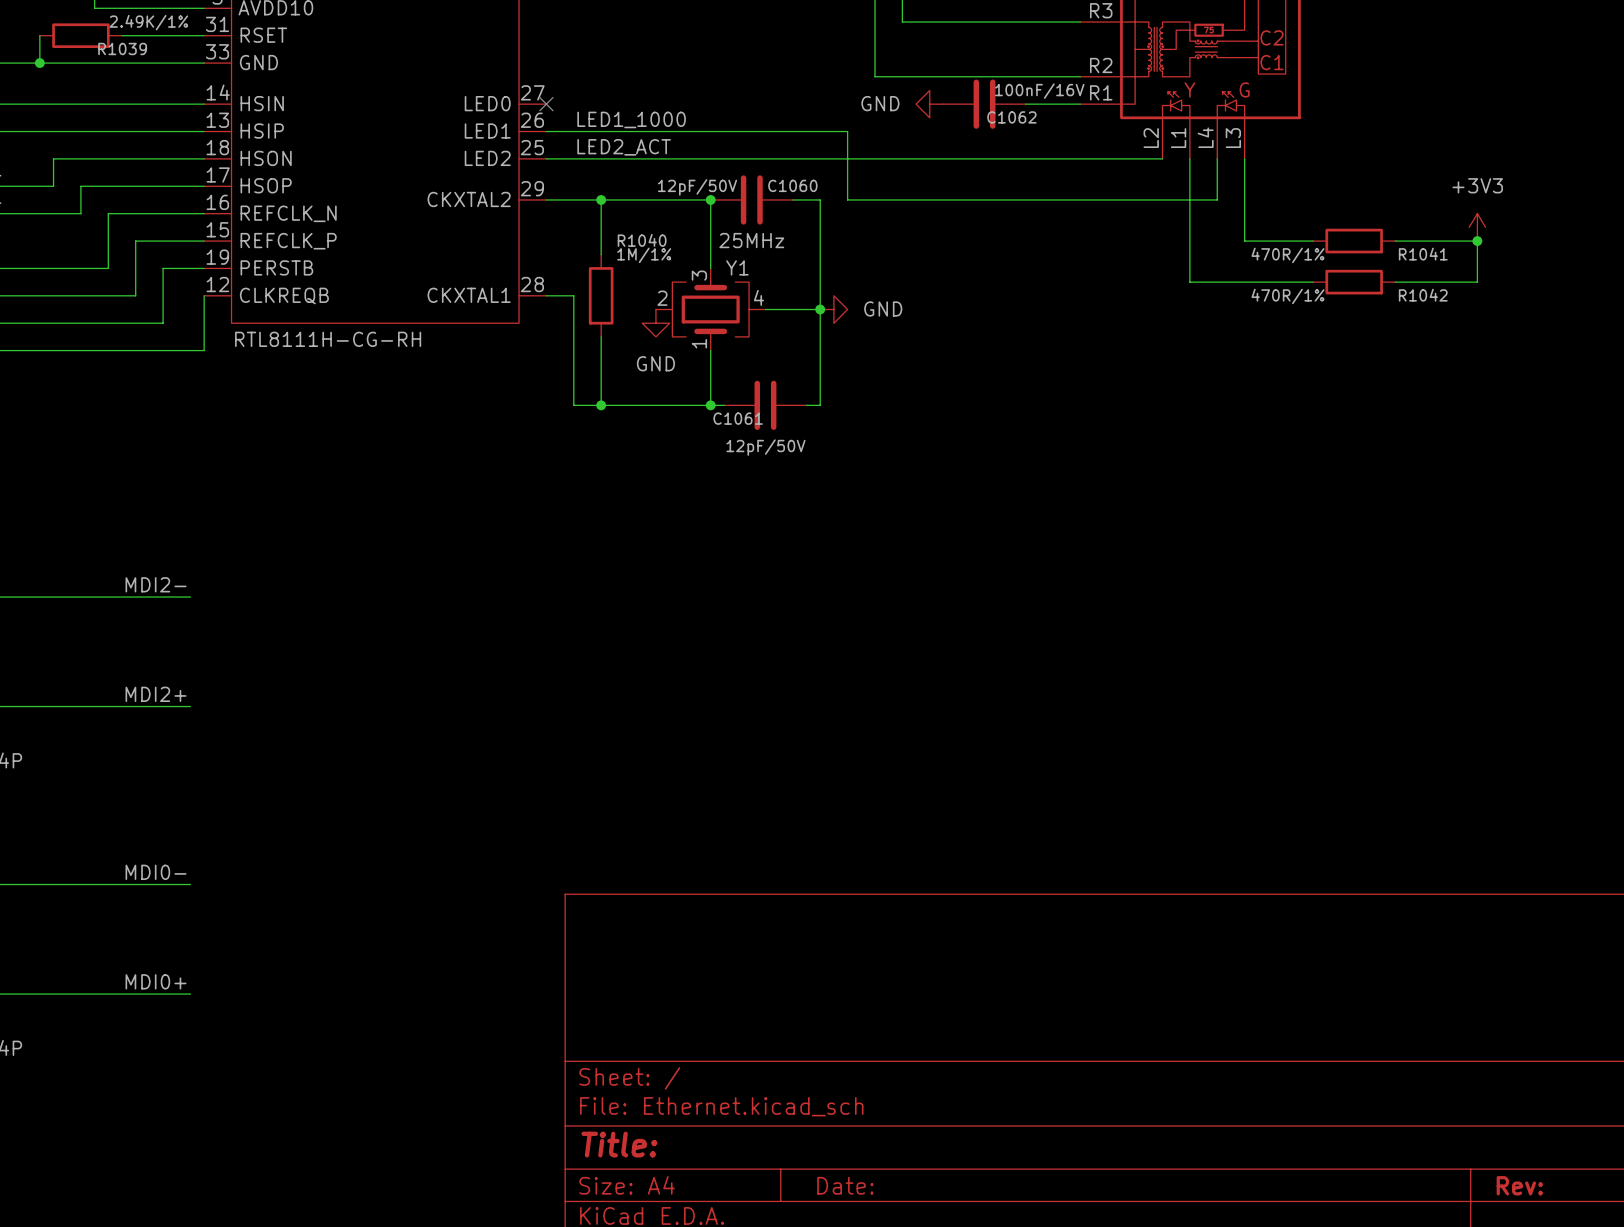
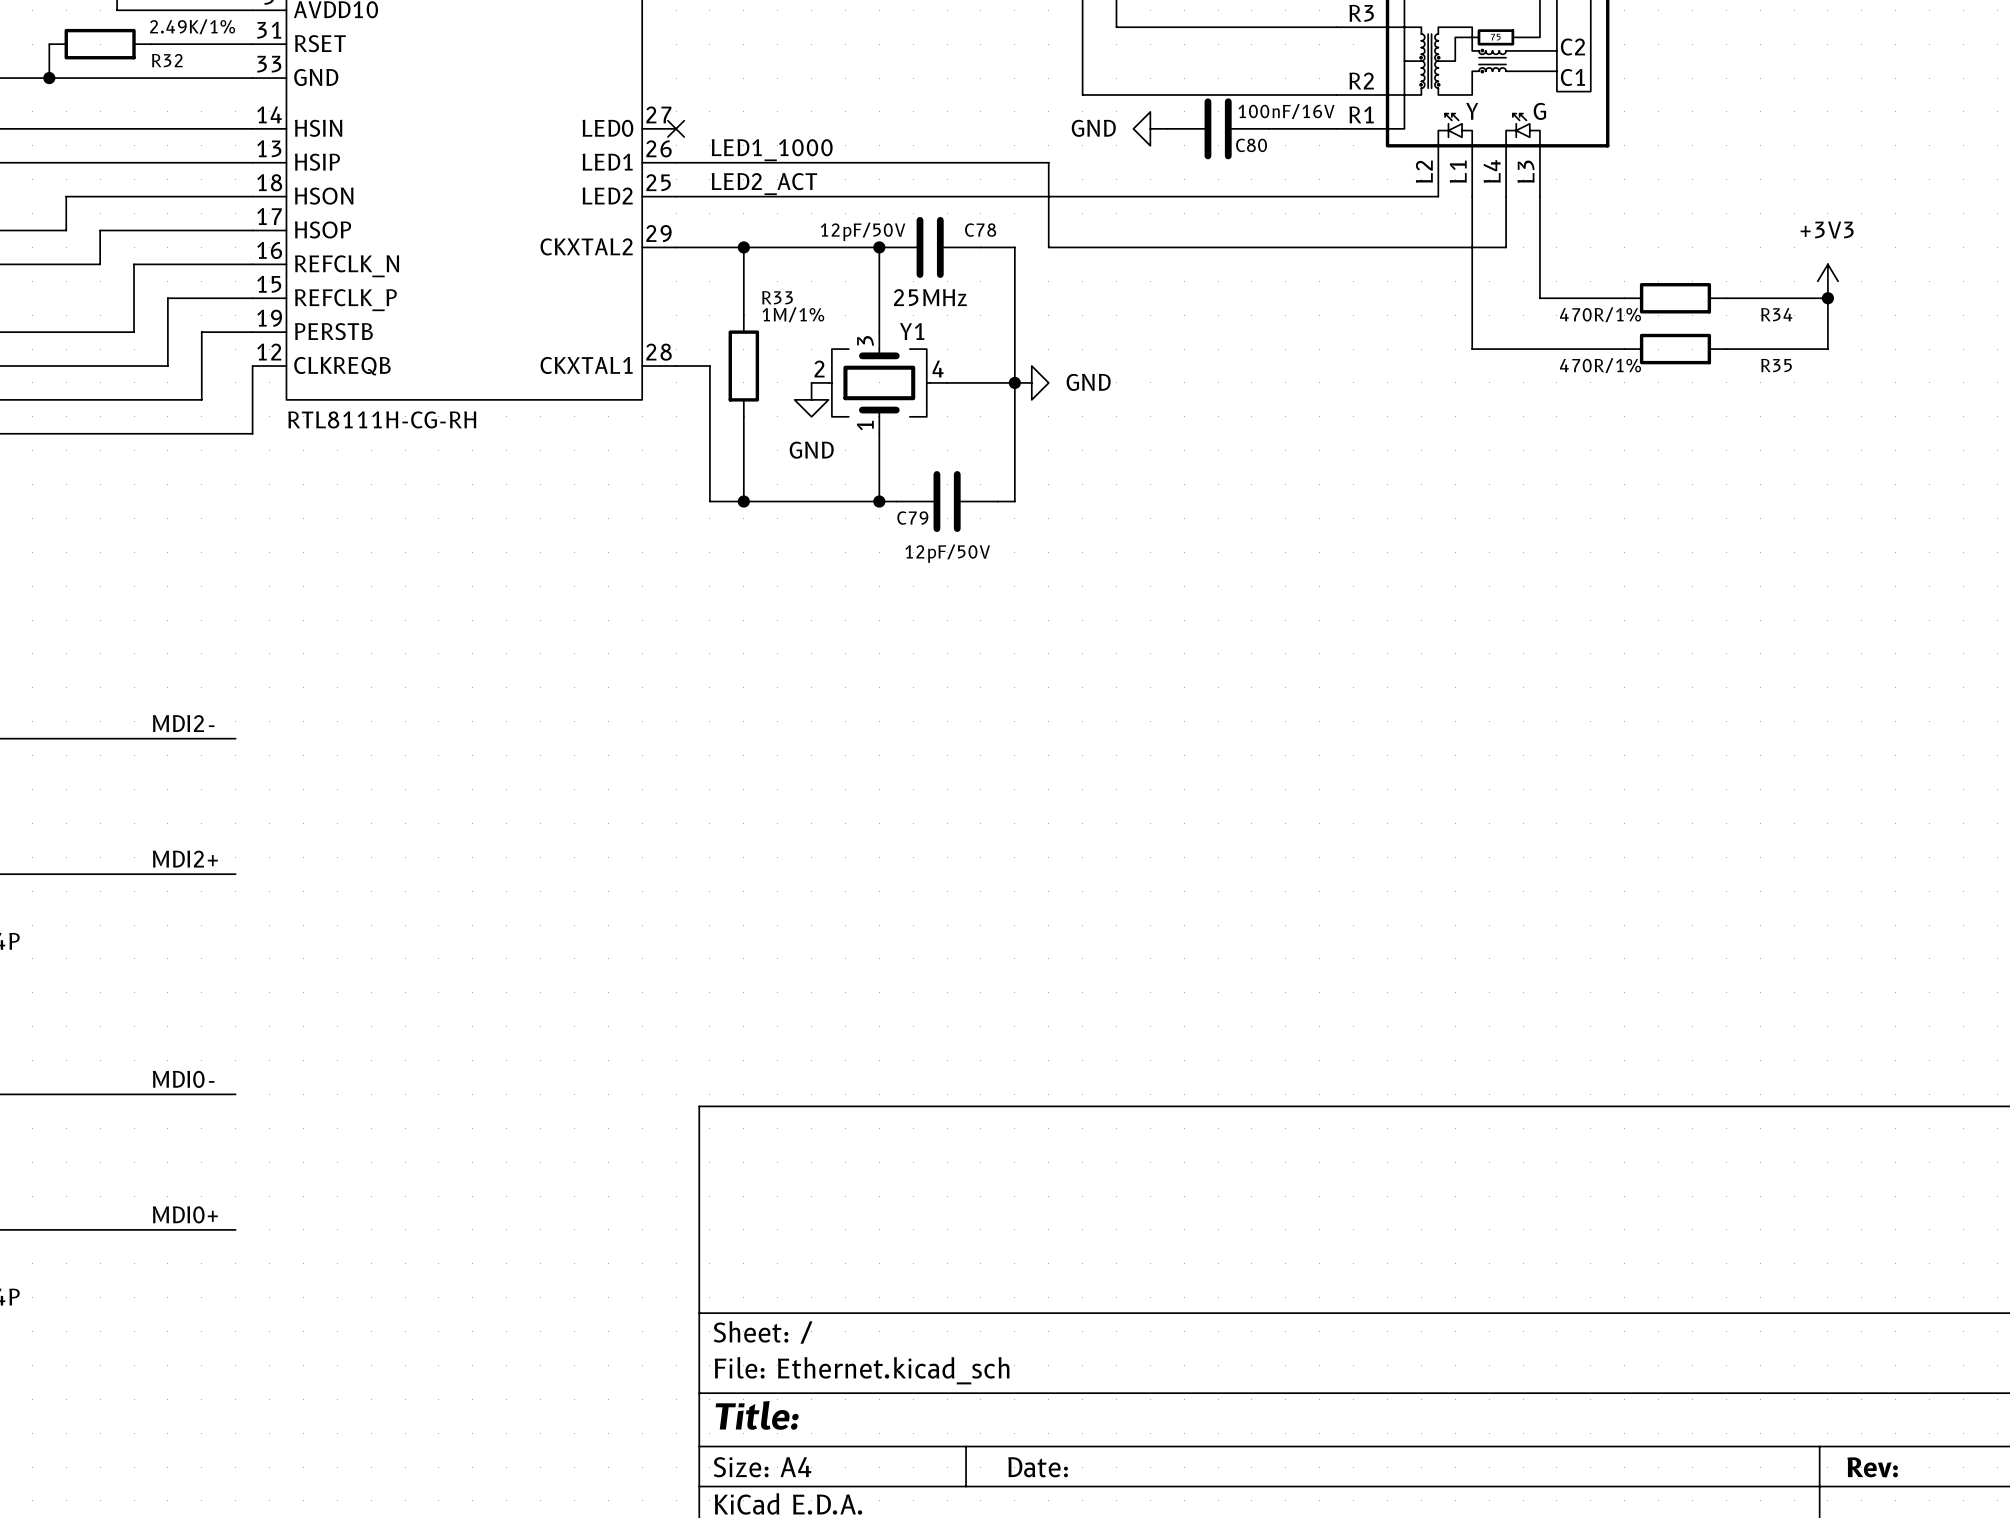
R1039 name: R1039 (122, 48) -> R32 (167, 60)
C1062 name: C1062 (1011, 117) -> C80 (1251, 145)
C1060 name: C1060 (792, 185) -> C78 (980, 230)
R1040 name: R1040 (642, 240) -> R33 (777, 297)
R1041 name: R1041 (1423, 254) -> R34 (1776, 314)
R1042 name: R1042 (1423, 295) -> R35 (1776, 365)
C1061 name: C1061 (738, 418) -> C79 (912, 518)

